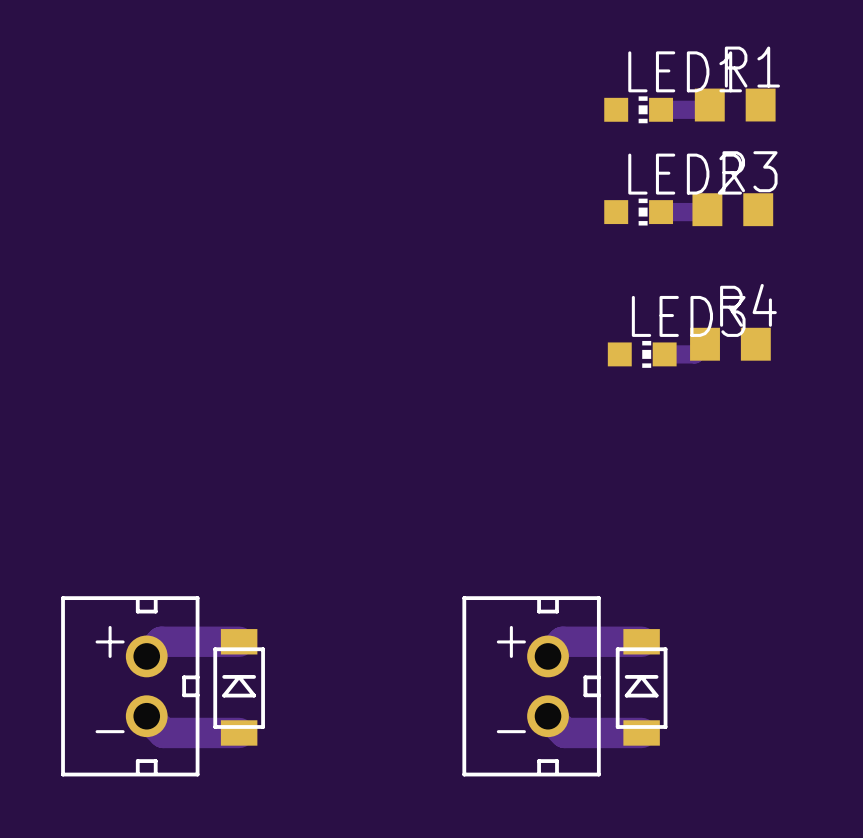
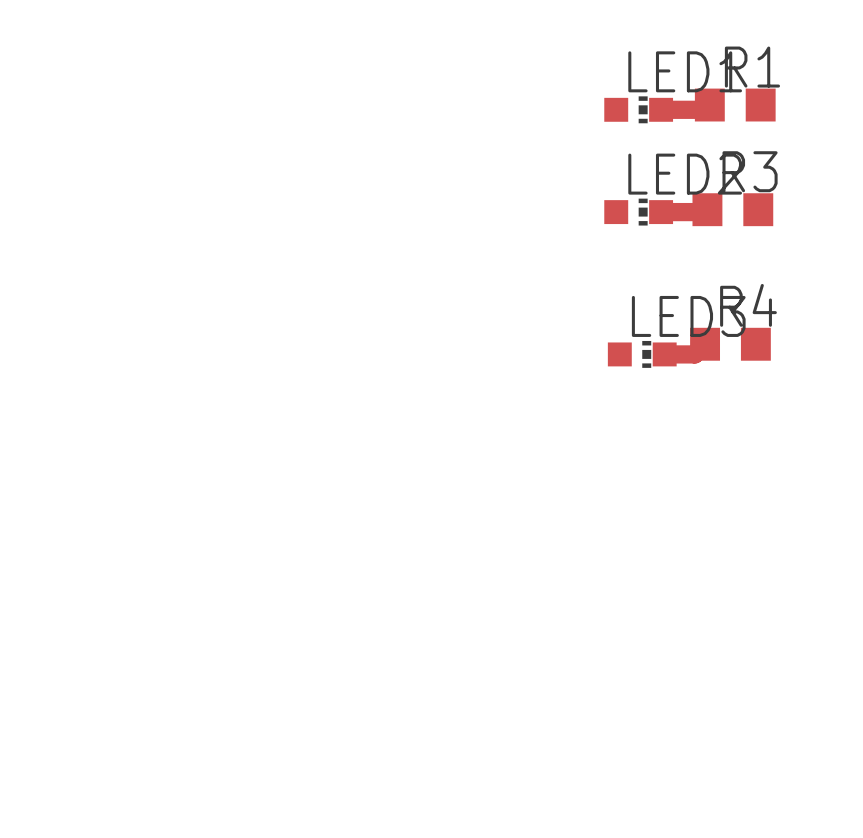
track: (239, 641) (161, 641) (146, 656) -> none
track: (641, 641) (562, 641) (548, 656) -> none
part: (130, 686) -> none
part: (531, 686) -> none
part: (239, 687) -> none
part: (641, 687) -> none
track: (146, 716) (163, 732) (239, 732) -> none
track: (548, 716) (564, 732) (641, 732) -> none

